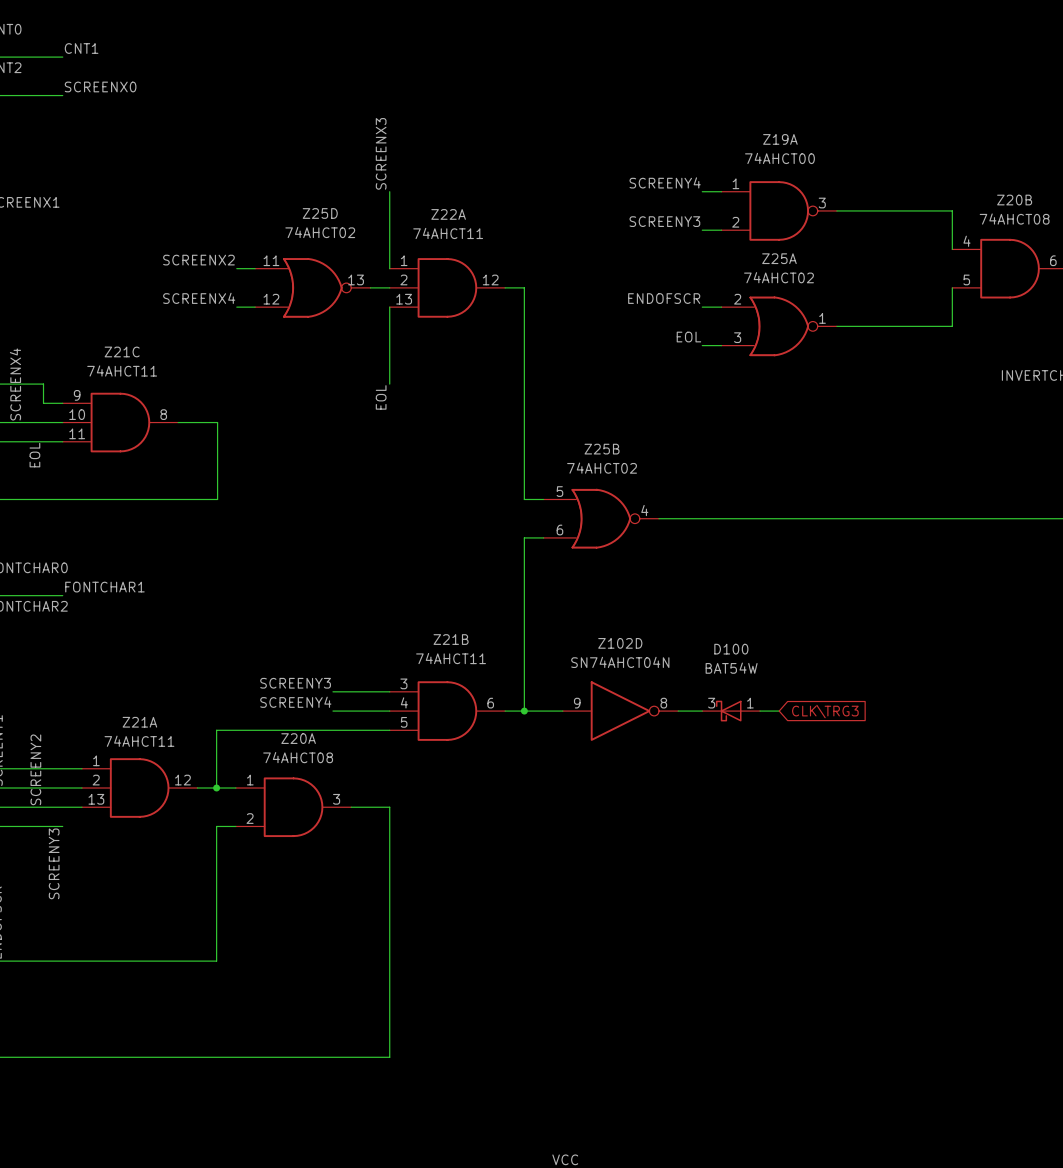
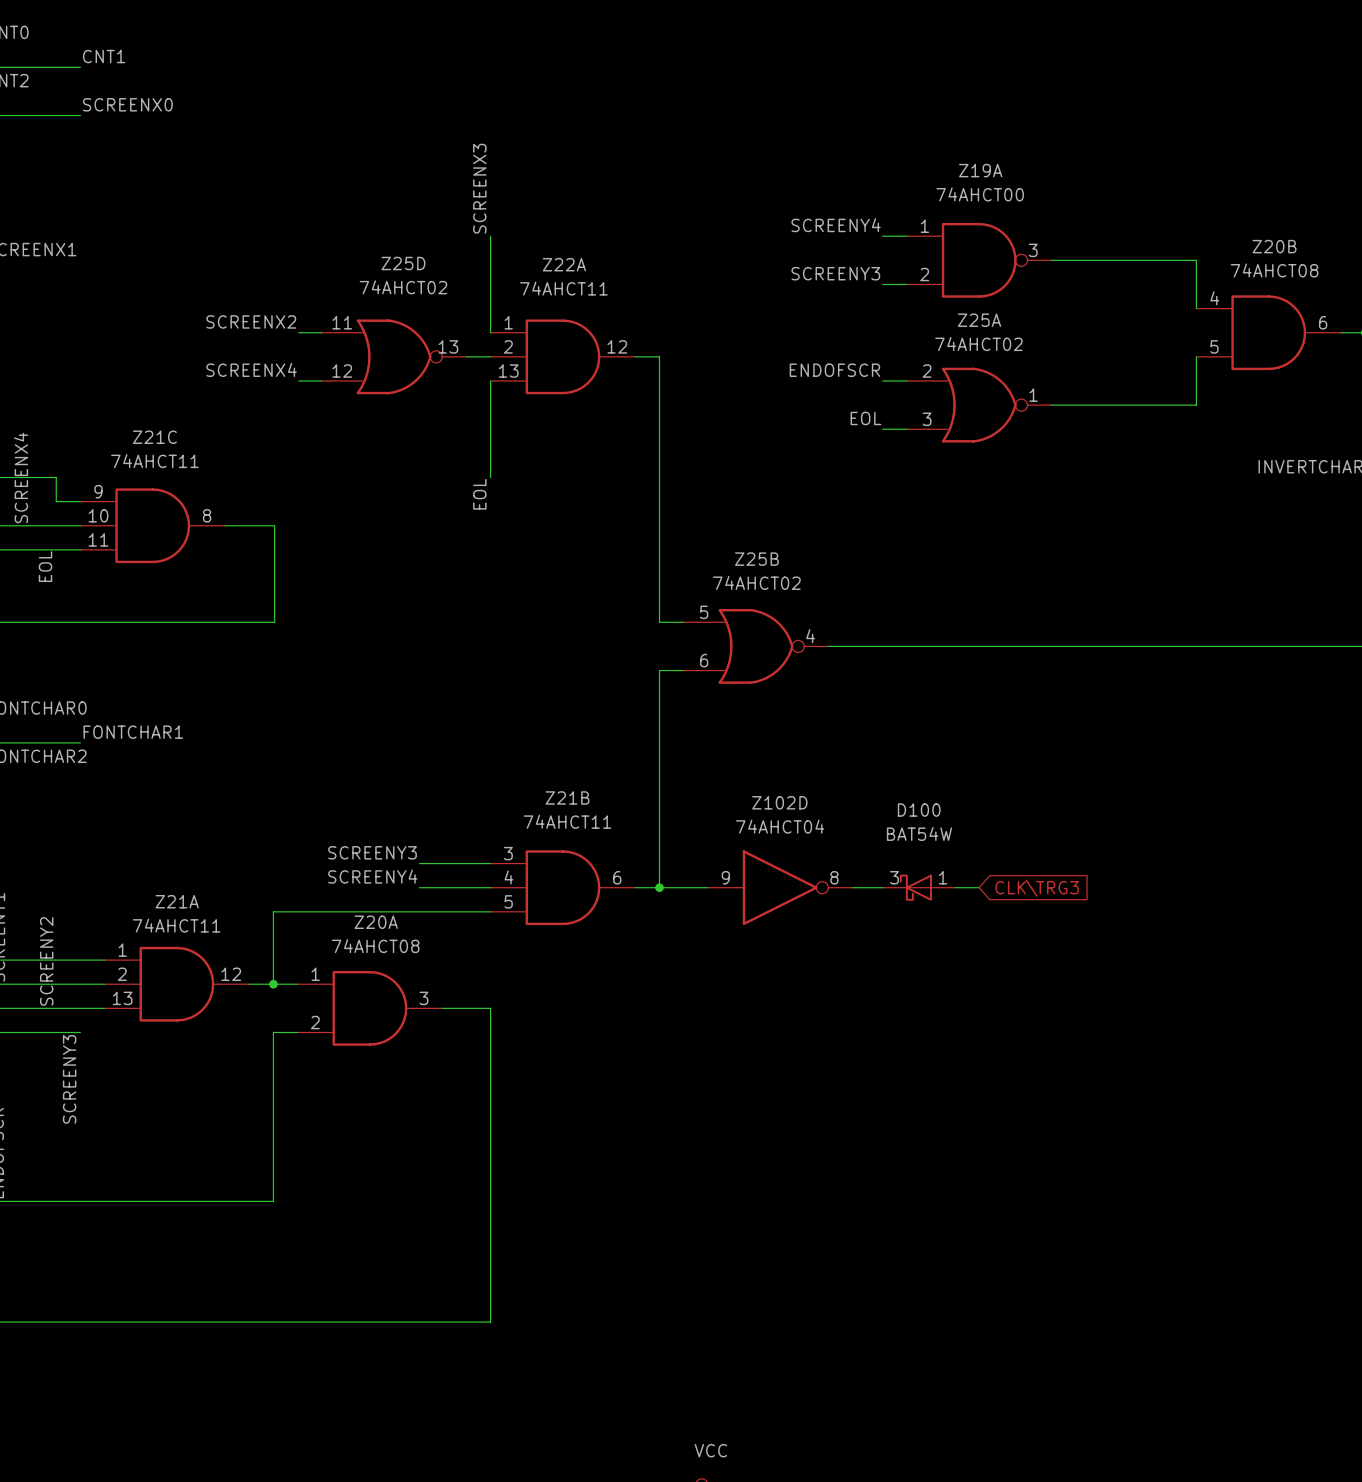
Z102D value: SN74AHCT04N (620, 662) -> 74AHCT04 (780, 826)

